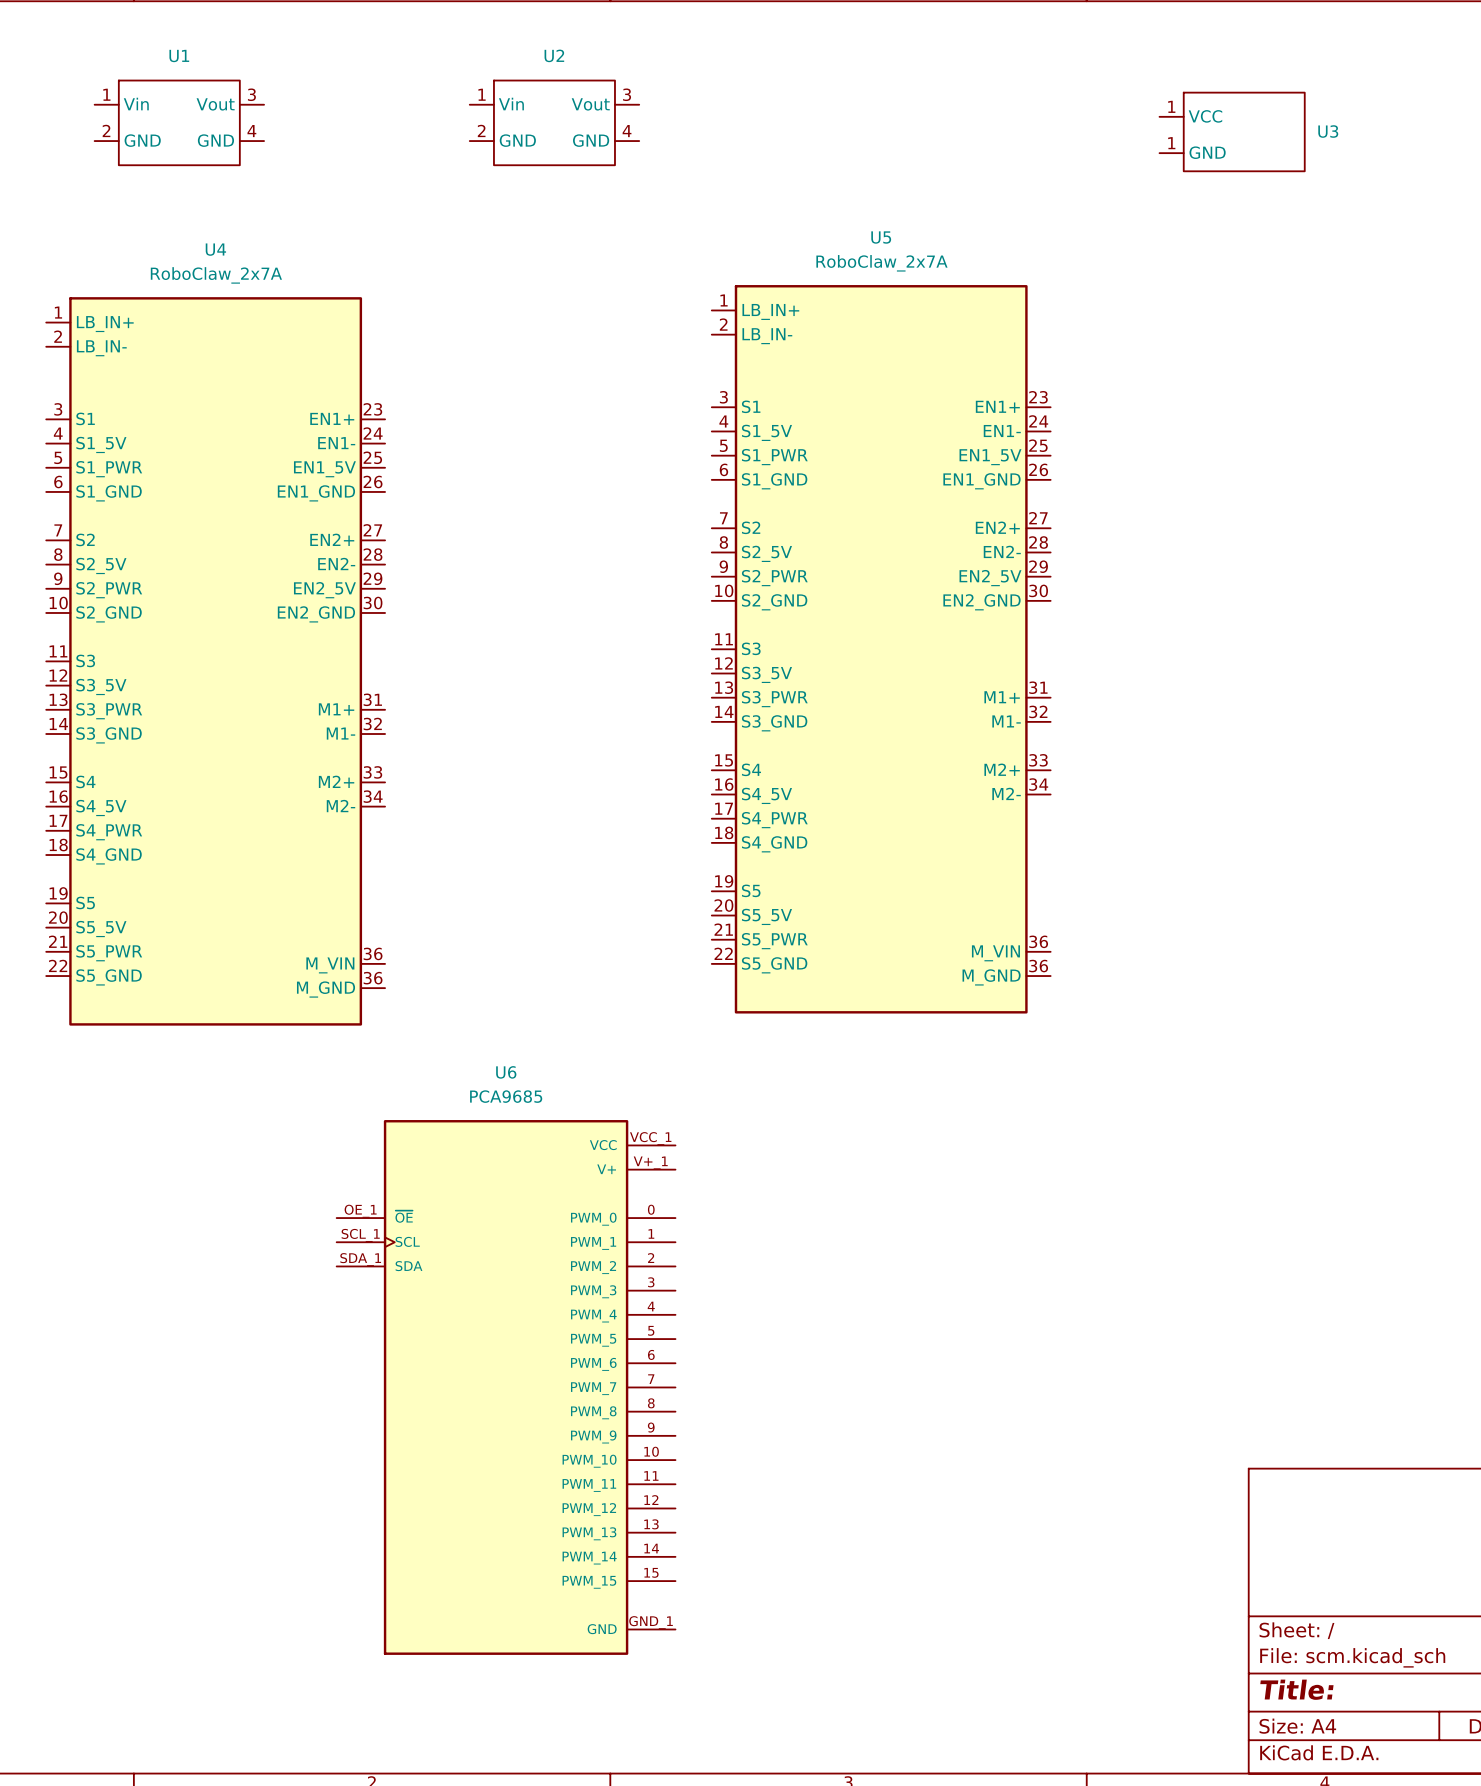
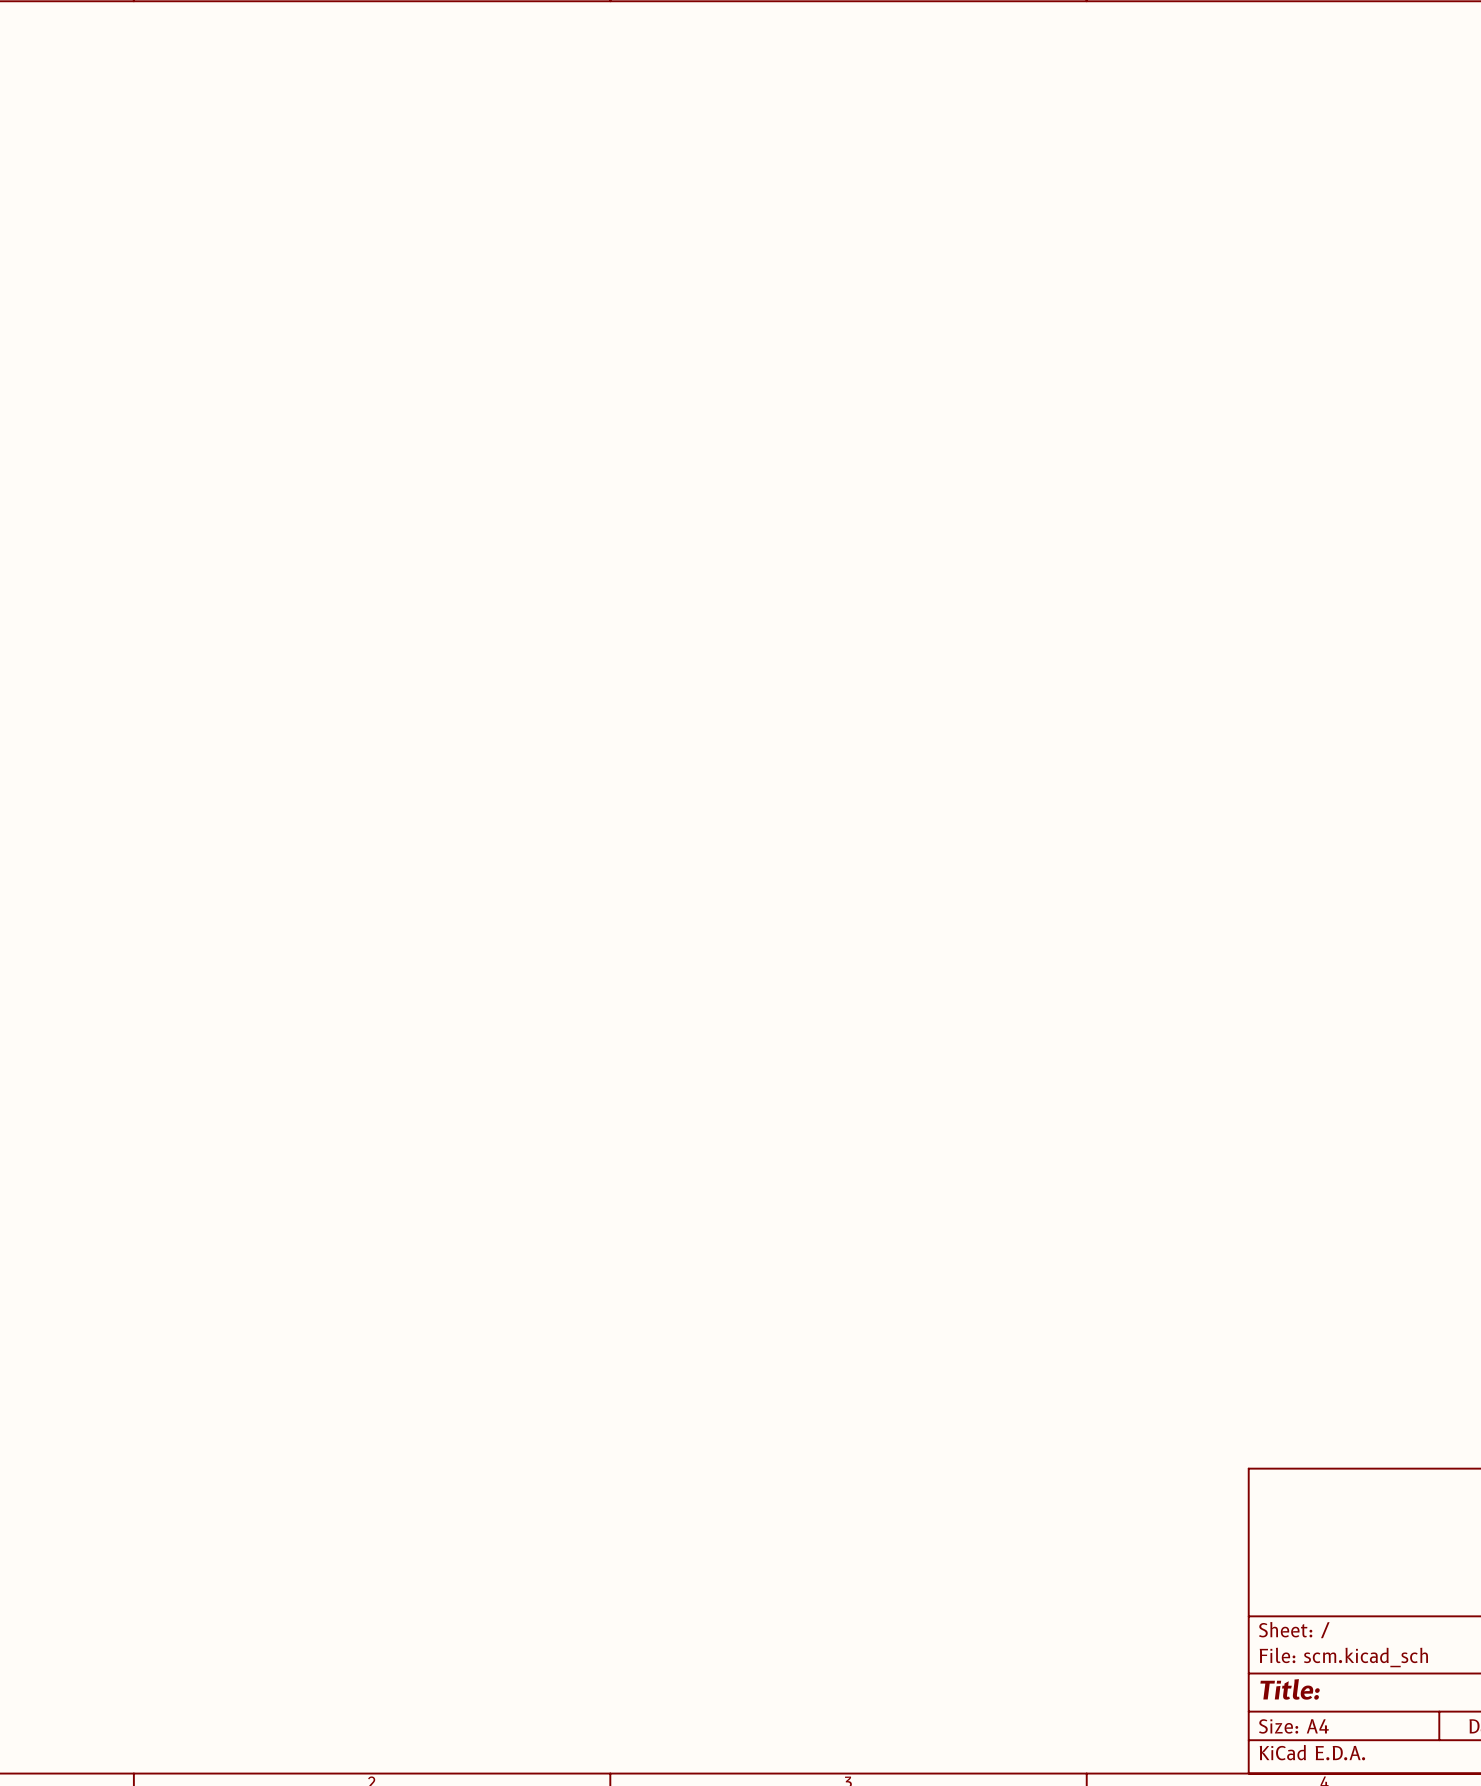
U1: (179, 122) -> none
U2: (554, 122) -> none
U3: (1232, 131) -> none
U5: RoboClaw_2x7A (881, 649) -> none
U4: RoboClaw_2x7A (215, 661) -> none
U6: PCA9685 (506, 1387) -> none

